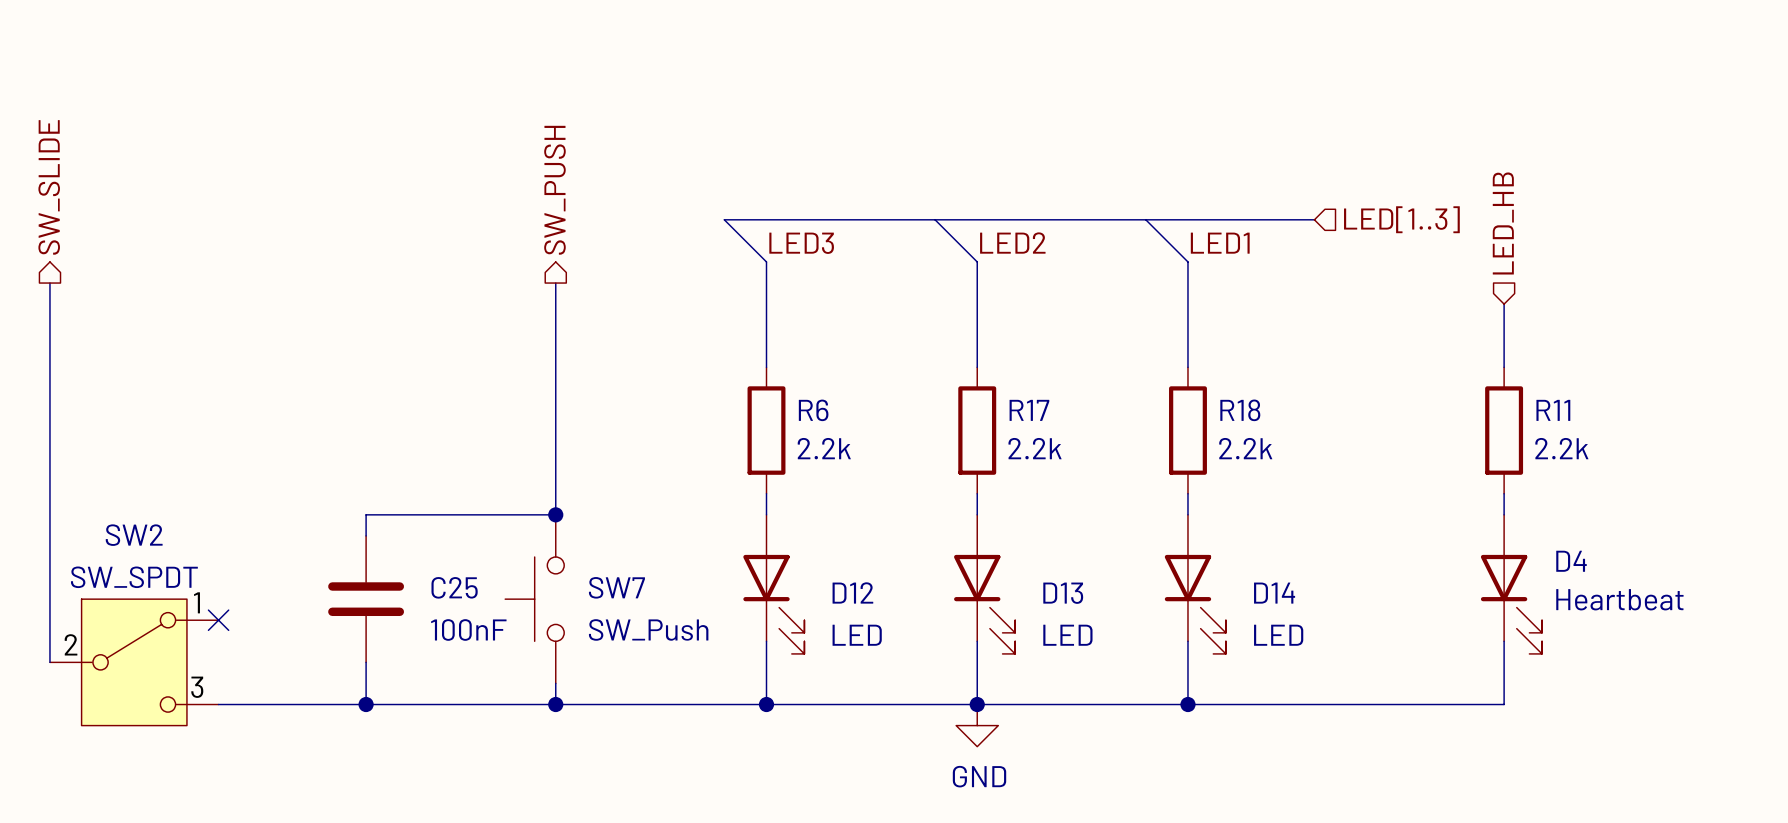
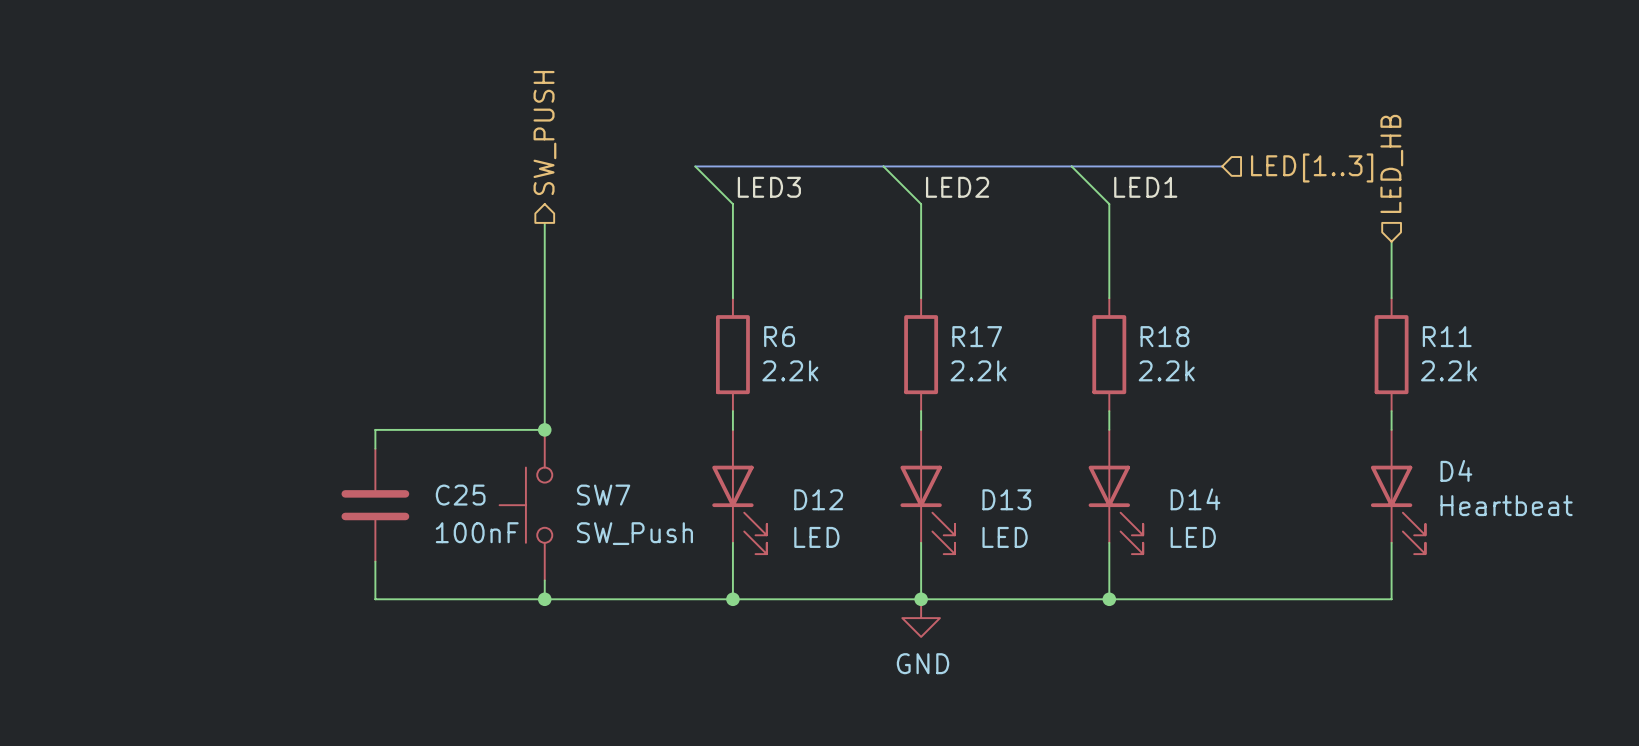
hierarchical label: SW_SLIDE (49, 187) -> none
wire: (49, 283) (49, 662) -> none
no-connect mark: (218, 620) -> none
SW2: SW_SPDT (134, 662) -> none
wire: (218, 704) (366, 704) -> none
junction: (366, 704) -> none

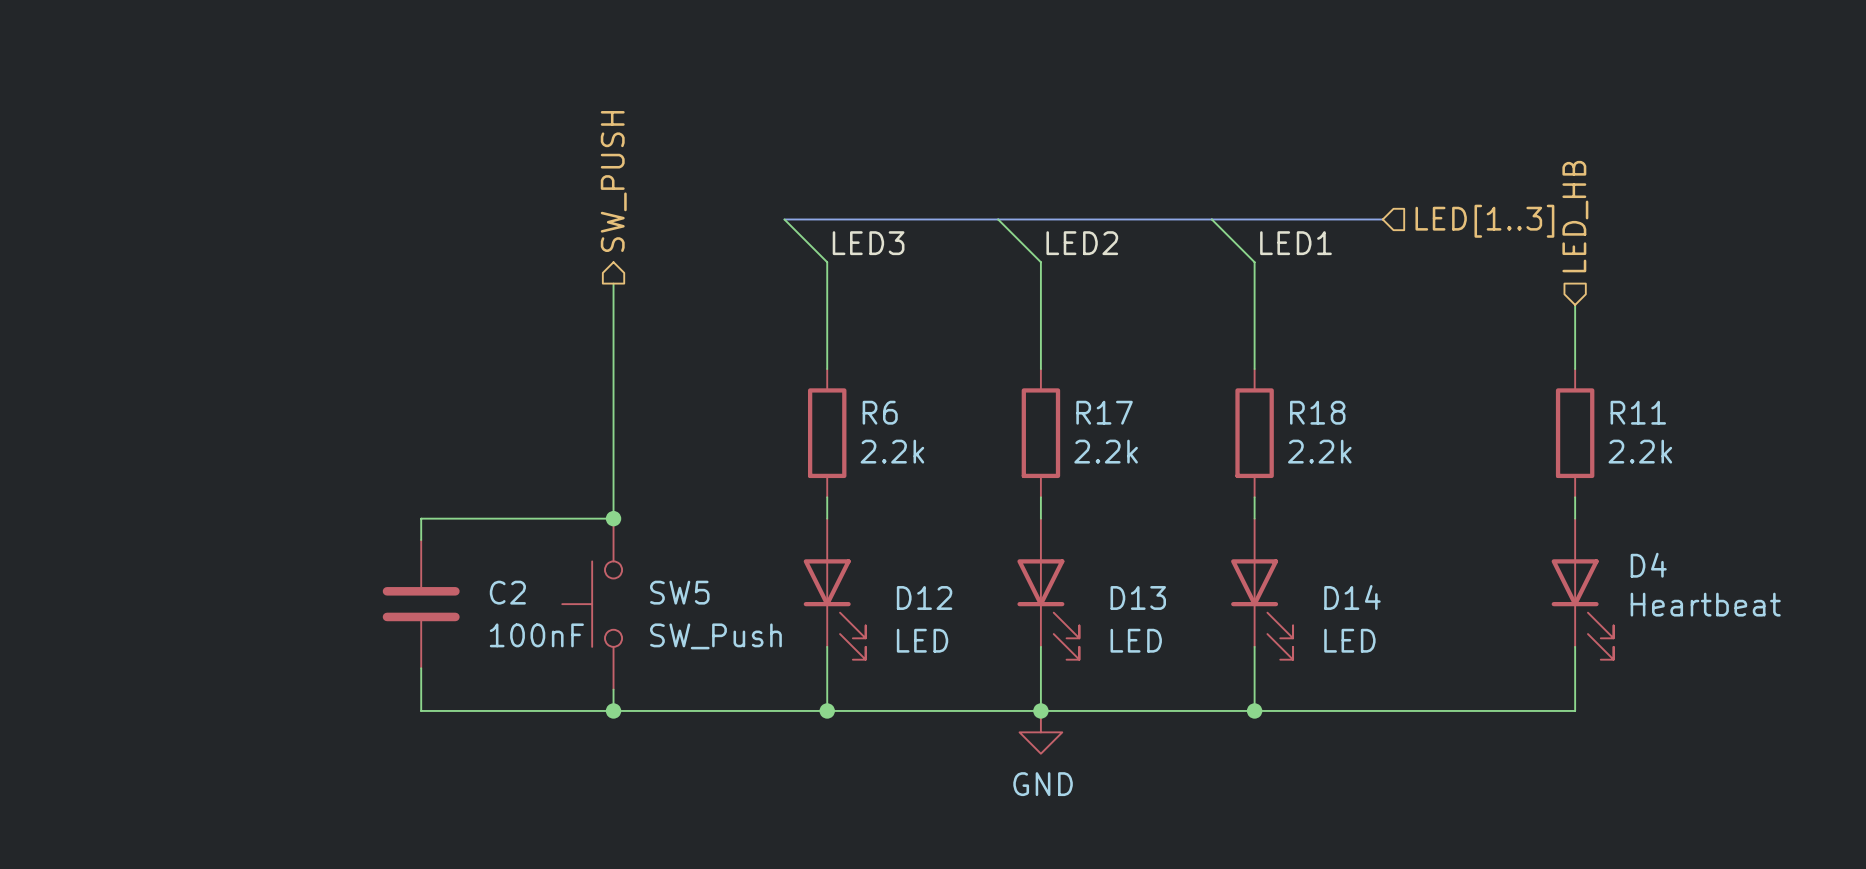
C25 name: C25 (460, 495) -> C2 (507, 592)
SW7 name: SW7 (603, 495) -> SW5 (679, 592)

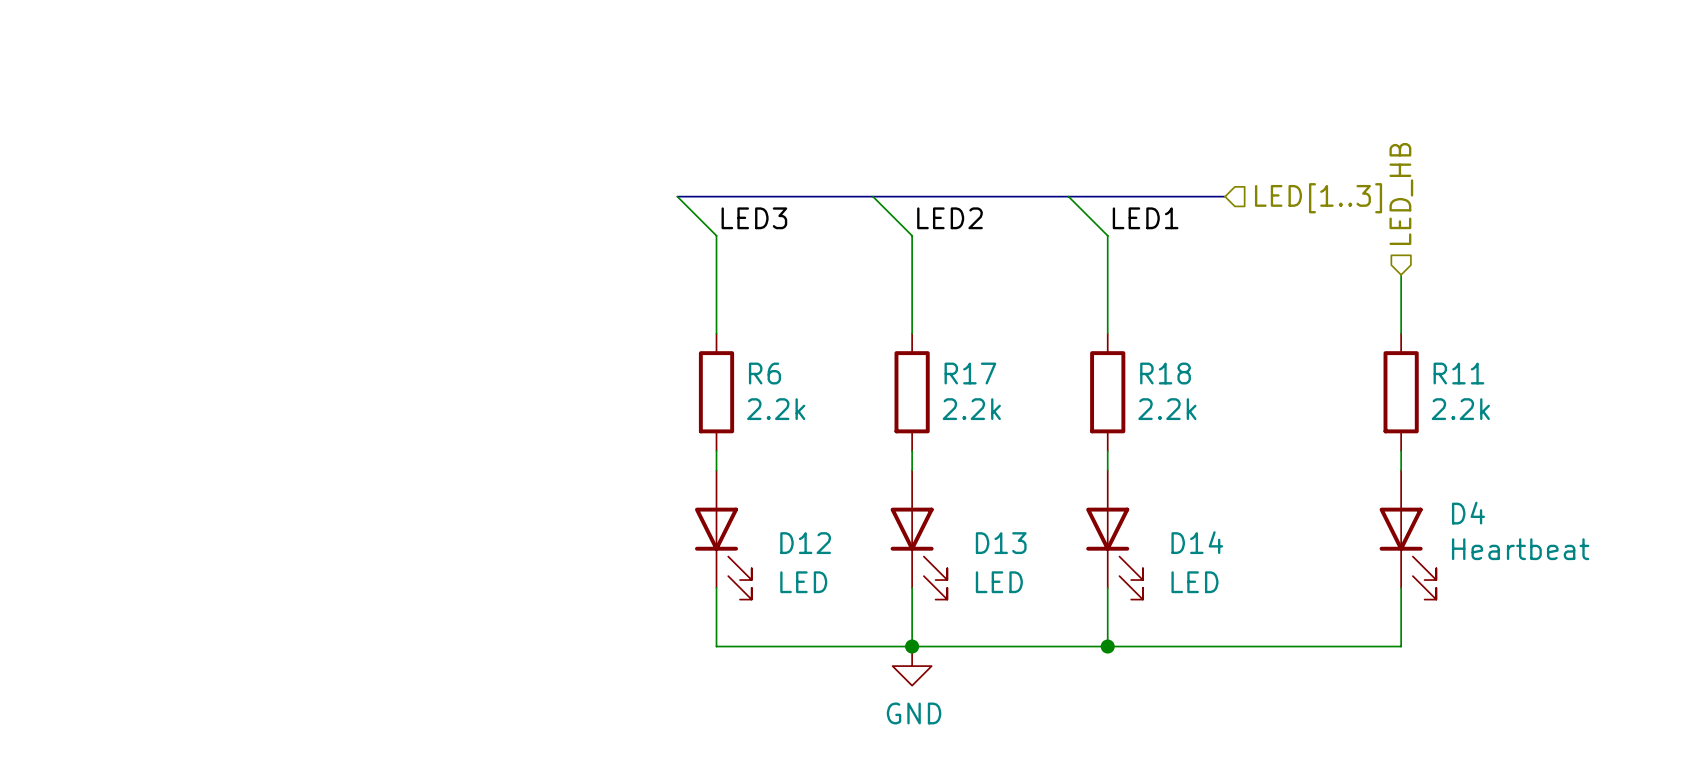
hierarchical label: SW_PUSH (613, 181) -> none
wire: (613, 283) (613, 518) (421, 518) (421, 540) -> none
junction: (613, 518) -> none
C2: 100nF (421, 604) -> none
SW5: SW_Push (592, 604) -> none
wire: (421, 668) (421, 710) (827, 710) -> none
wire: (613, 689) (613, 710) -> none
junction: (613, 710) -> none
junction: (827, 710) -> none

